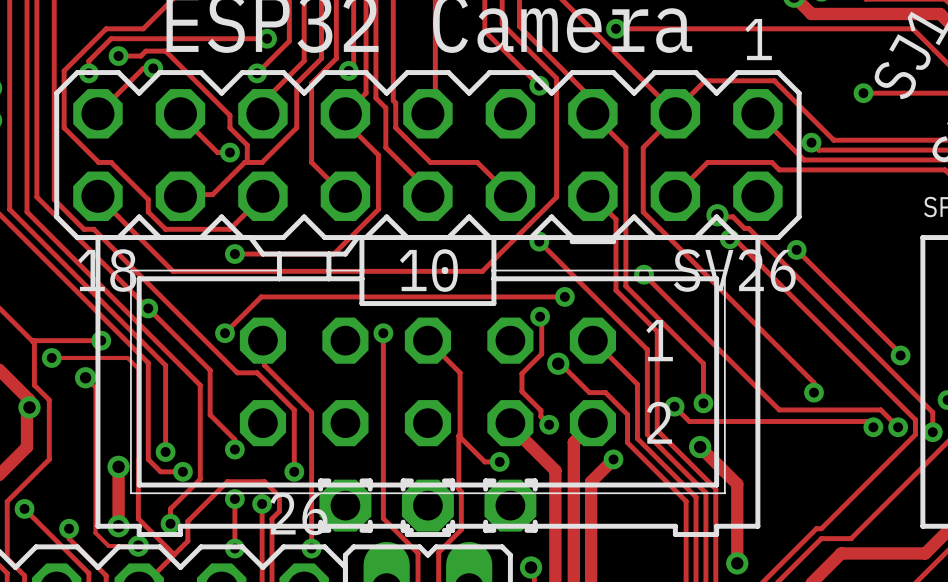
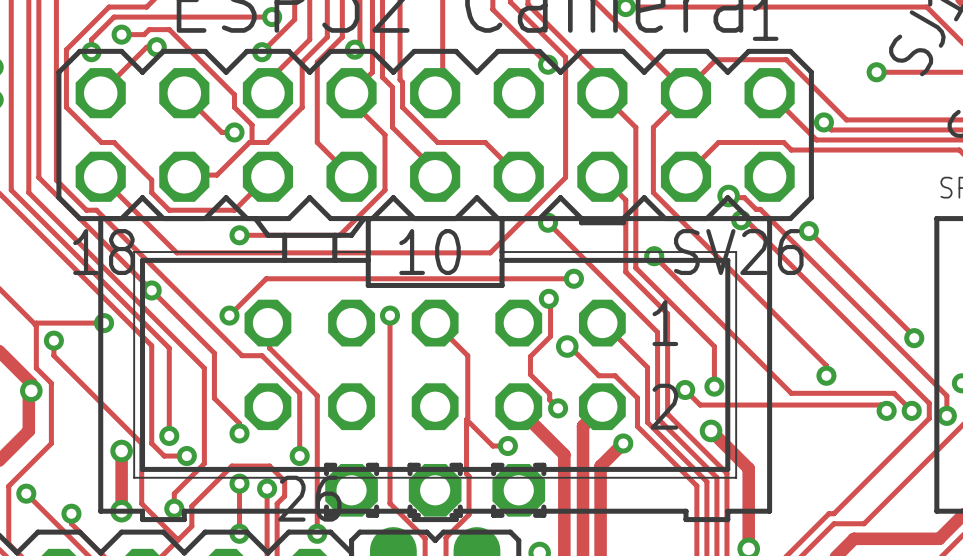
track: (51, 357) (127, 357) (138, 368) (138, 459) -> (53, 340) (53, 355) (141, 443)
track: (85, 377) (95, 387) (95, 532) (108, 546) (138, 546) -> none
via: (85, 377) -> none
via: (138, 546) -> none

